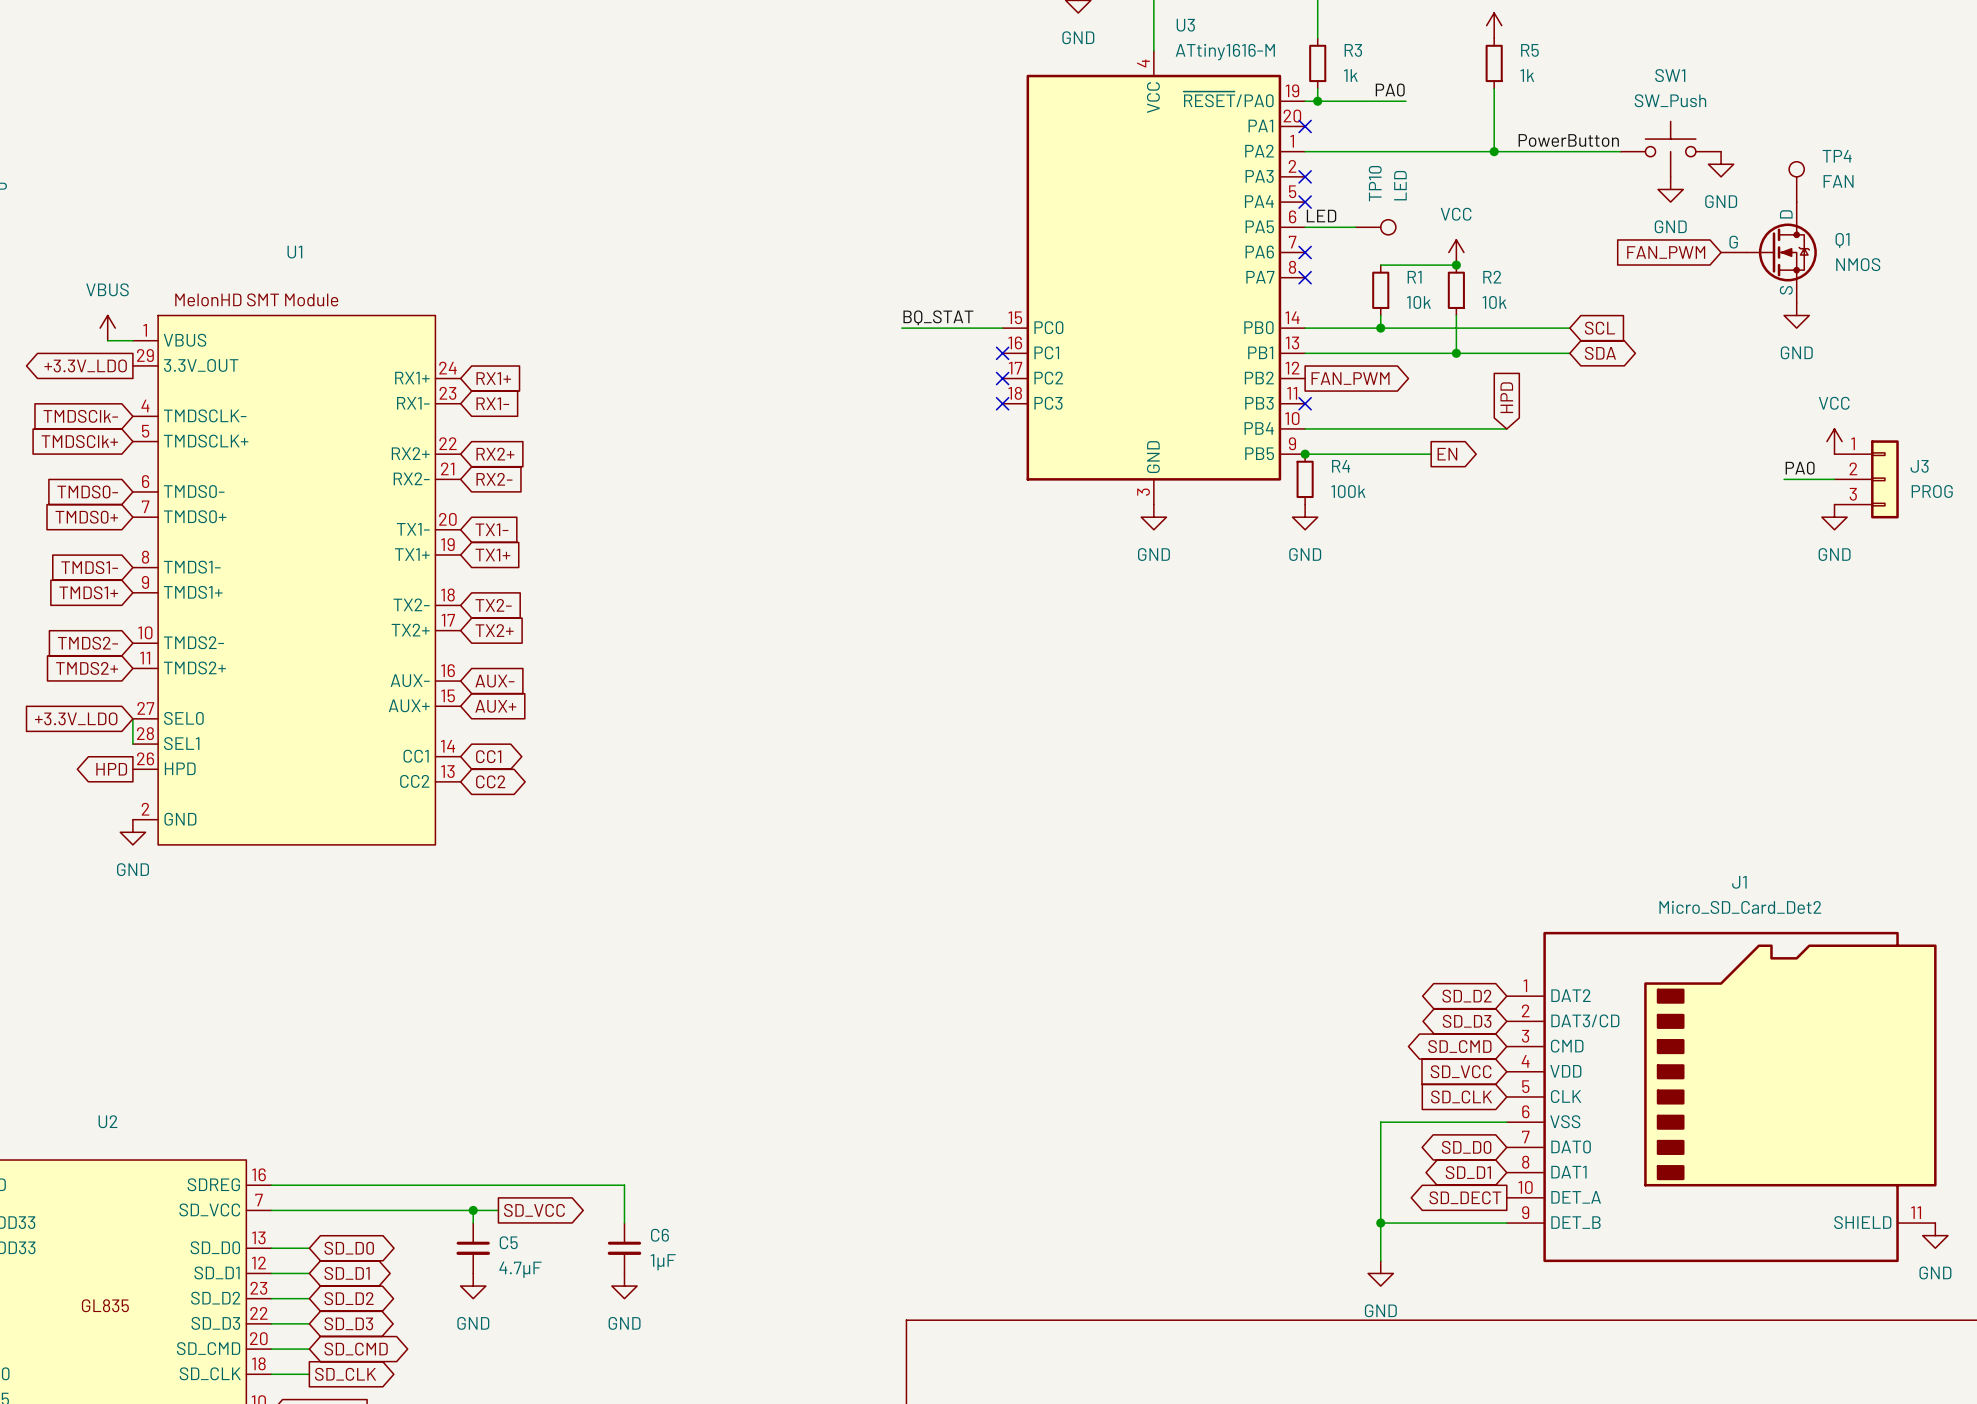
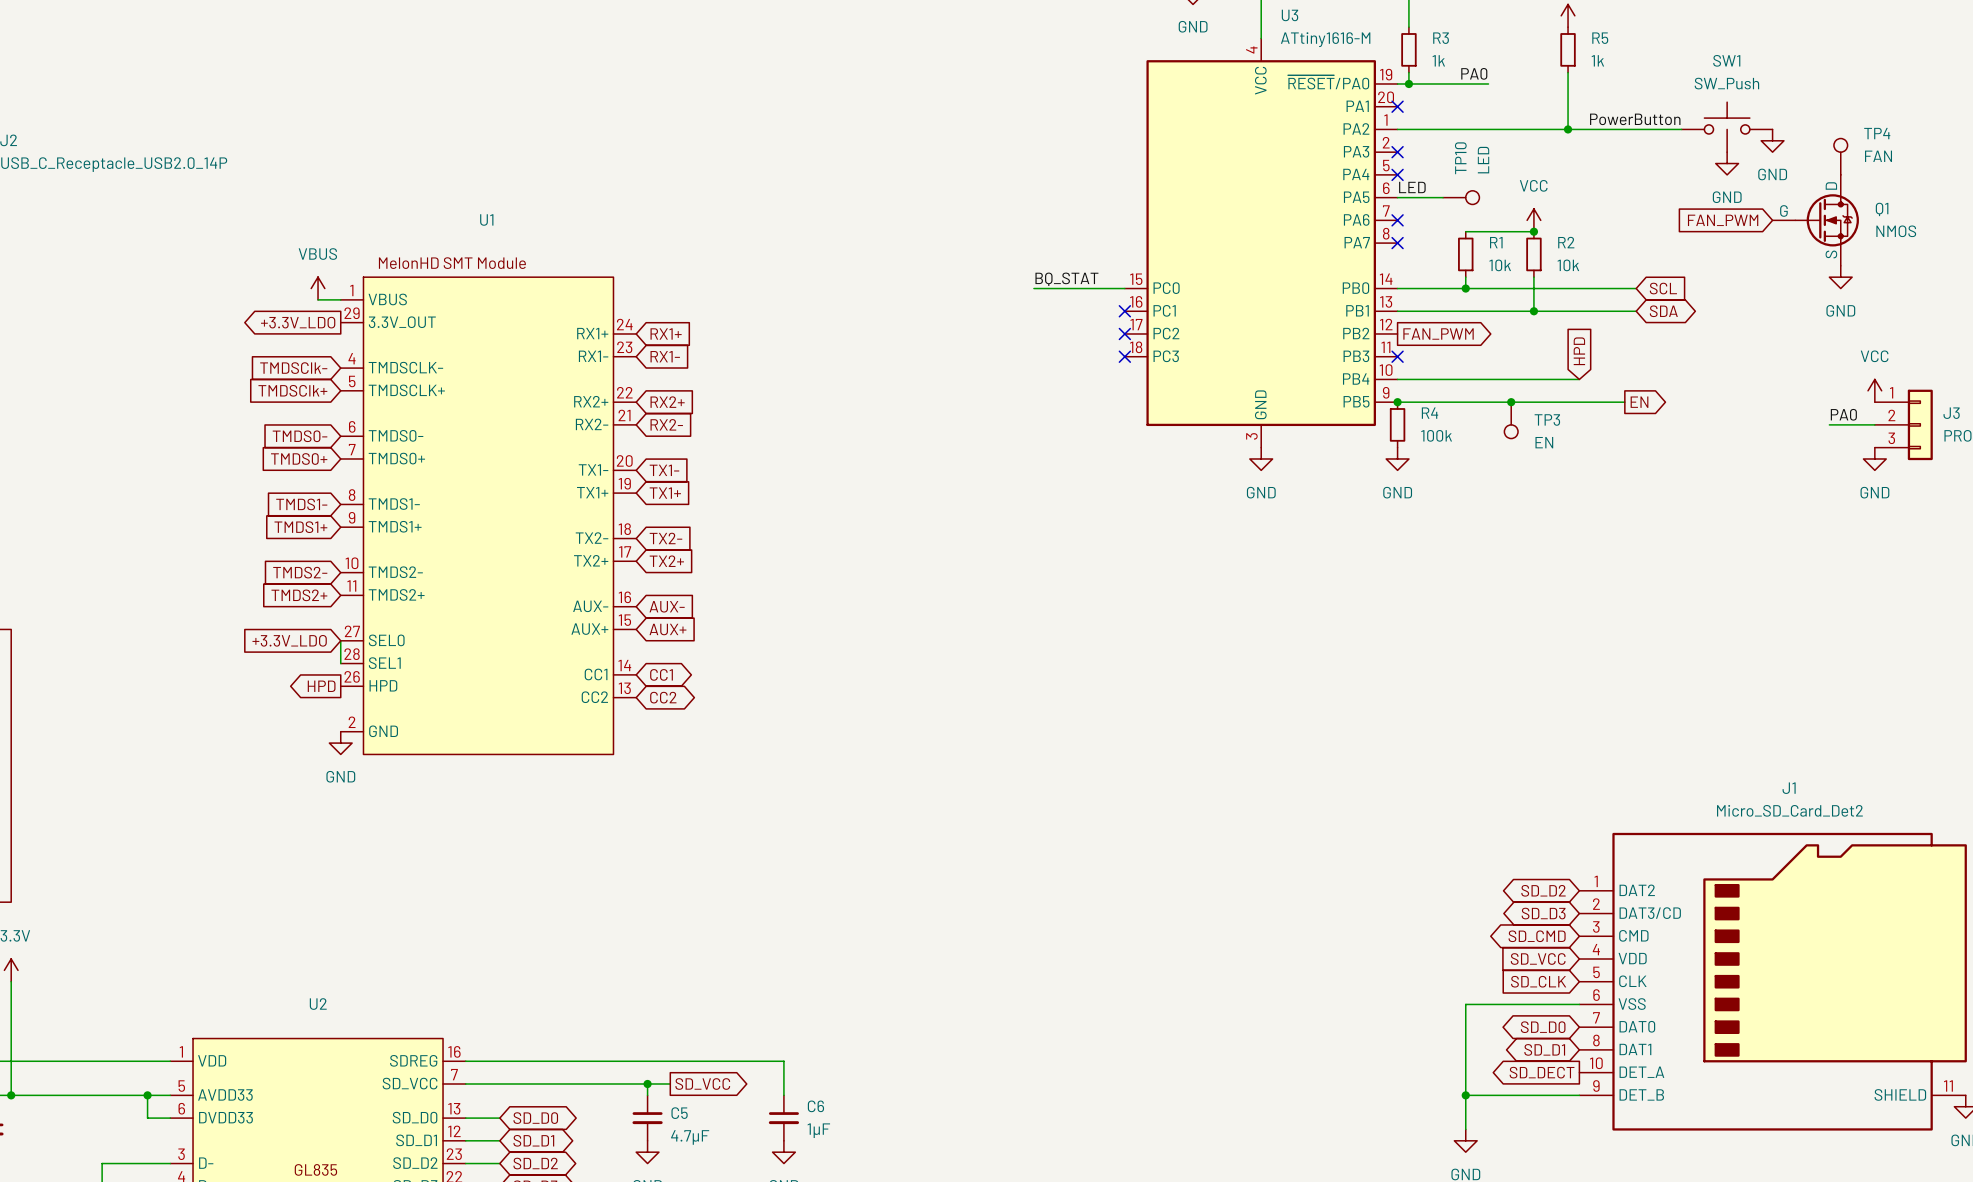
wire: none -> (1511, 402) (1624, 402)
junction: none -> (1511, 402)
global label position: EN (1447, 454) -> EN (1639, 402)
TP3: none -> EN (1511, 420)

